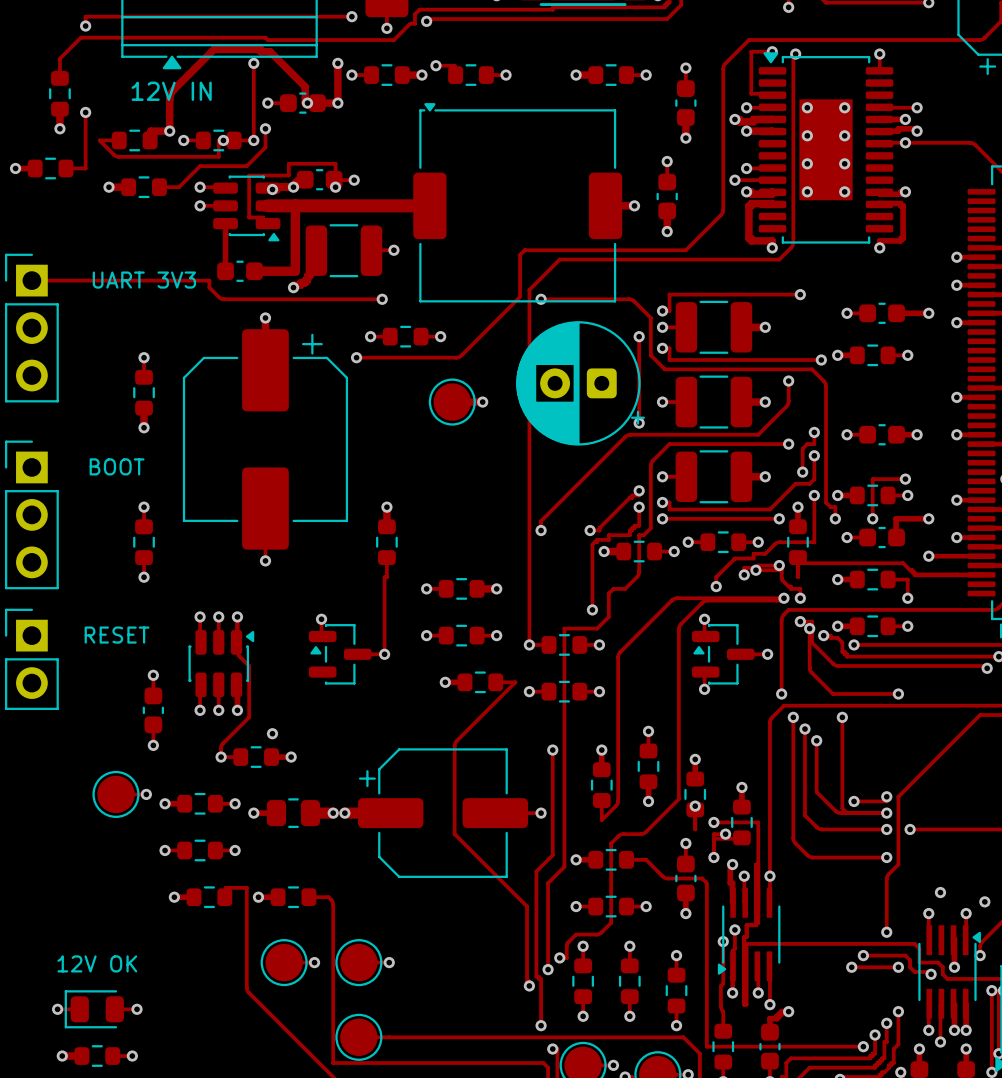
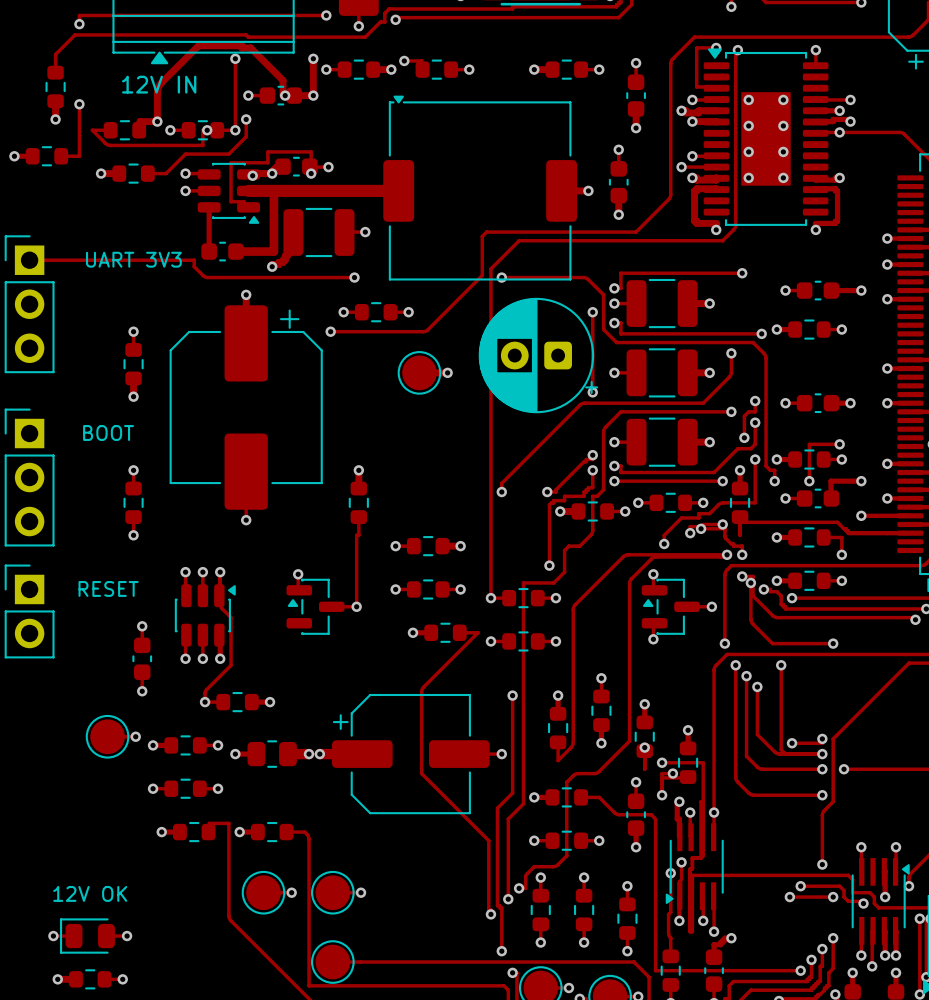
via: (272, 733) -> none
via: (940, 892) -> none
via: (984, 901) -> none

